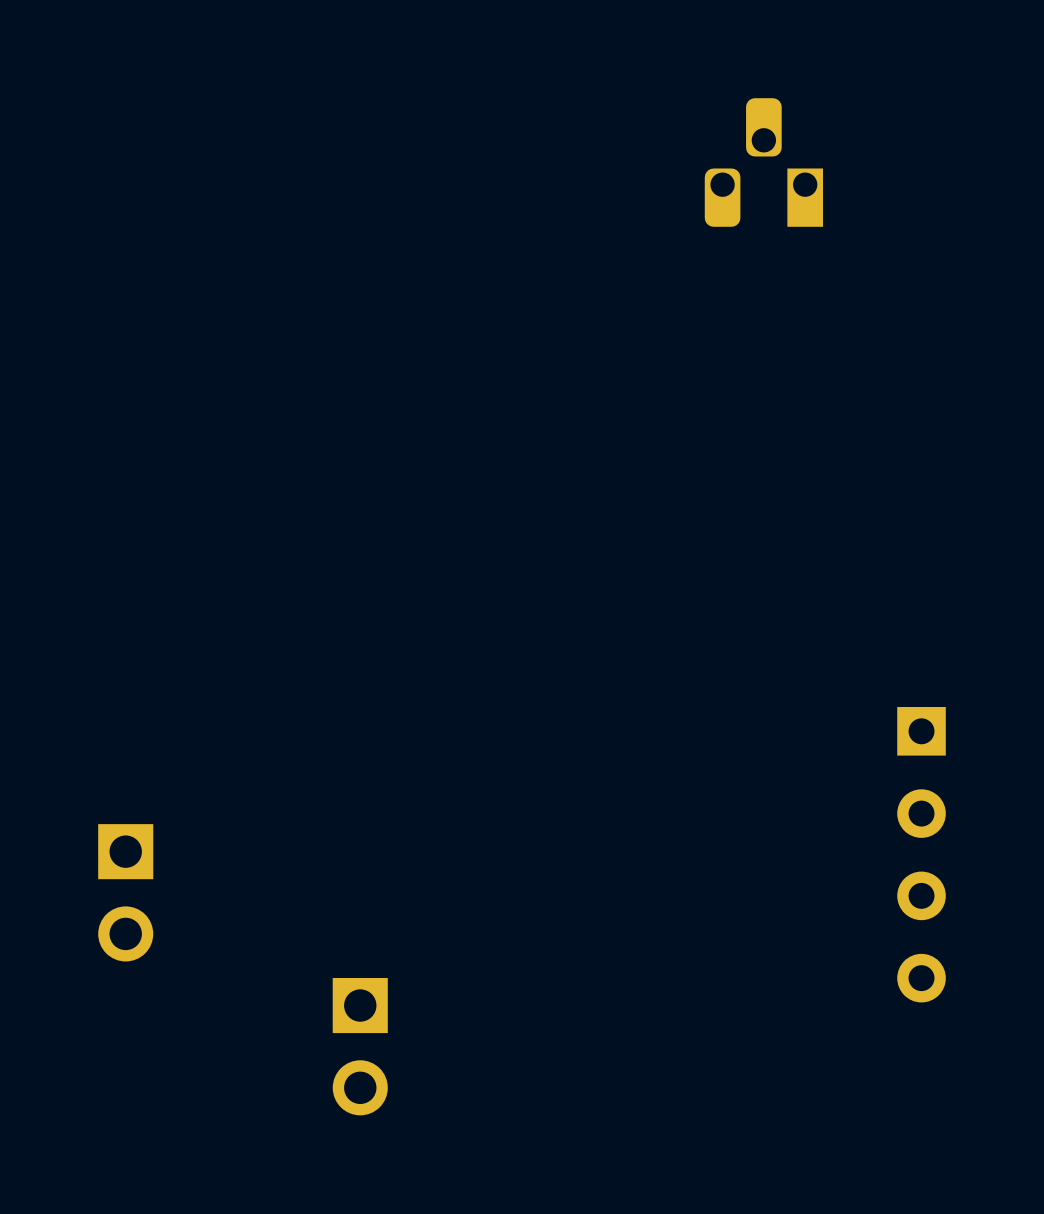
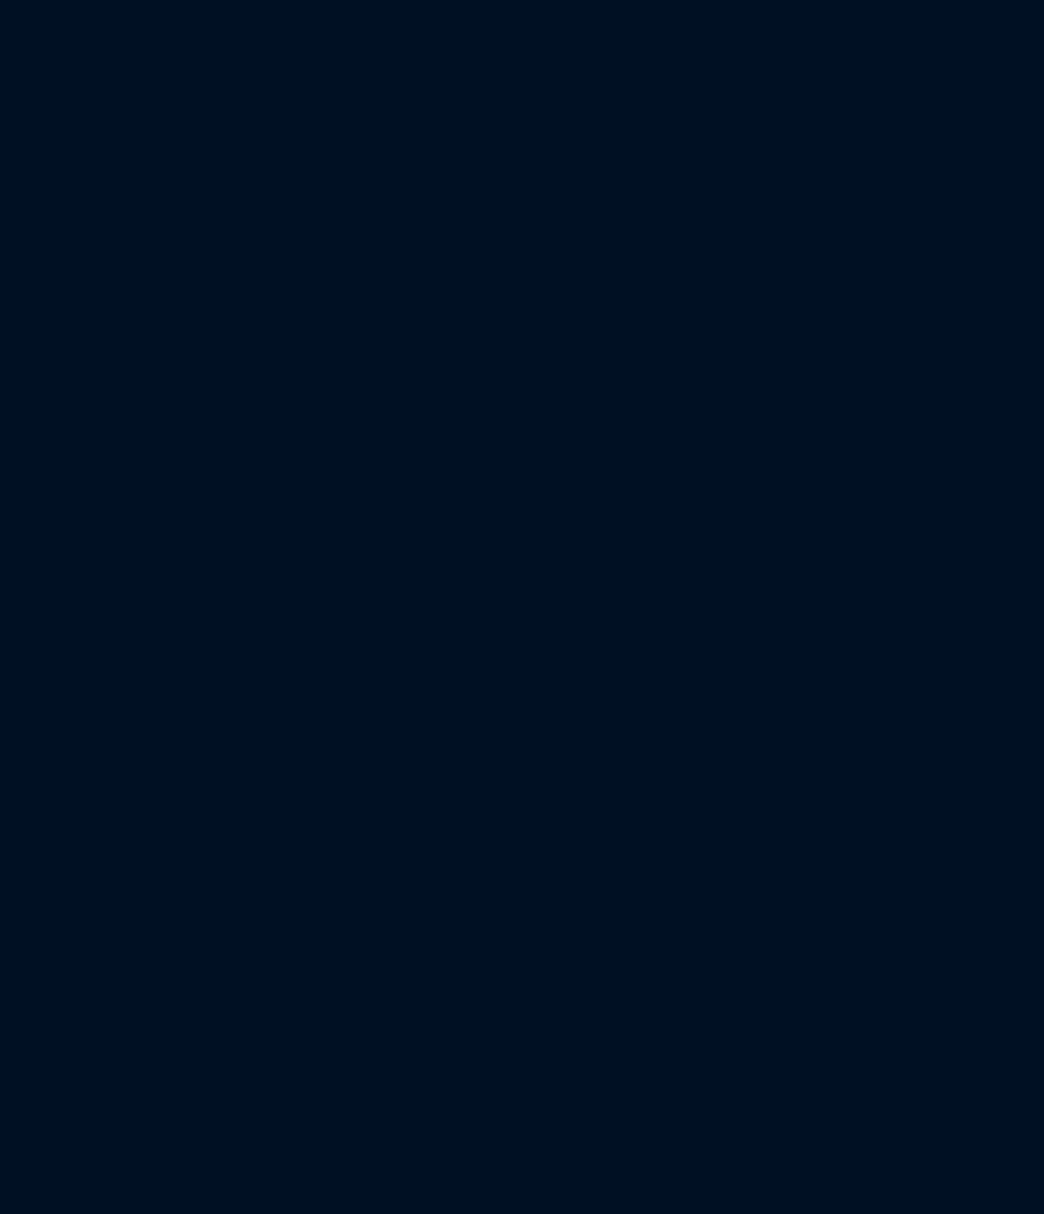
part: (763, 162) -> none
part: (921, 854) -> none
part: (125, 892) -> none
part: (360, 1046) -> none

